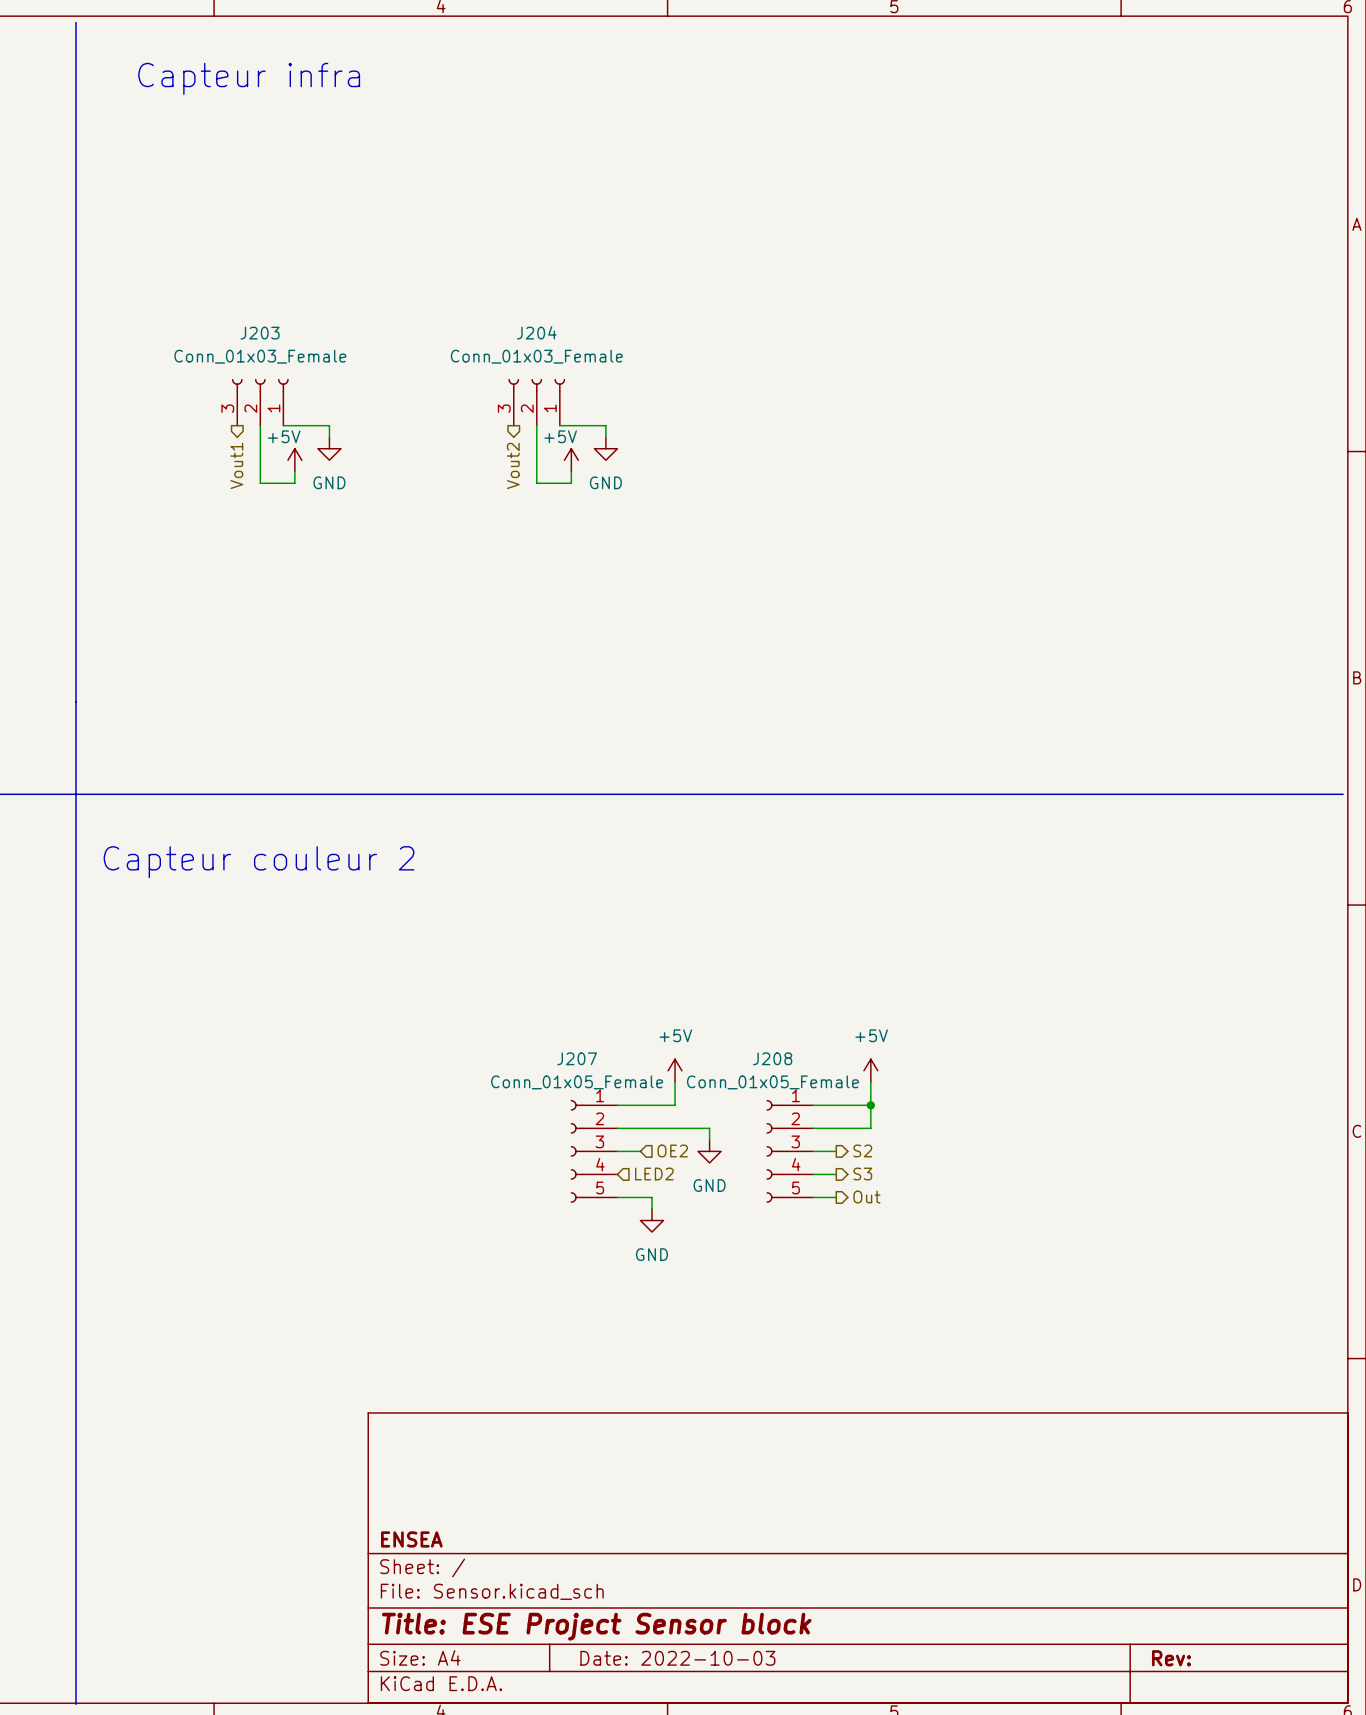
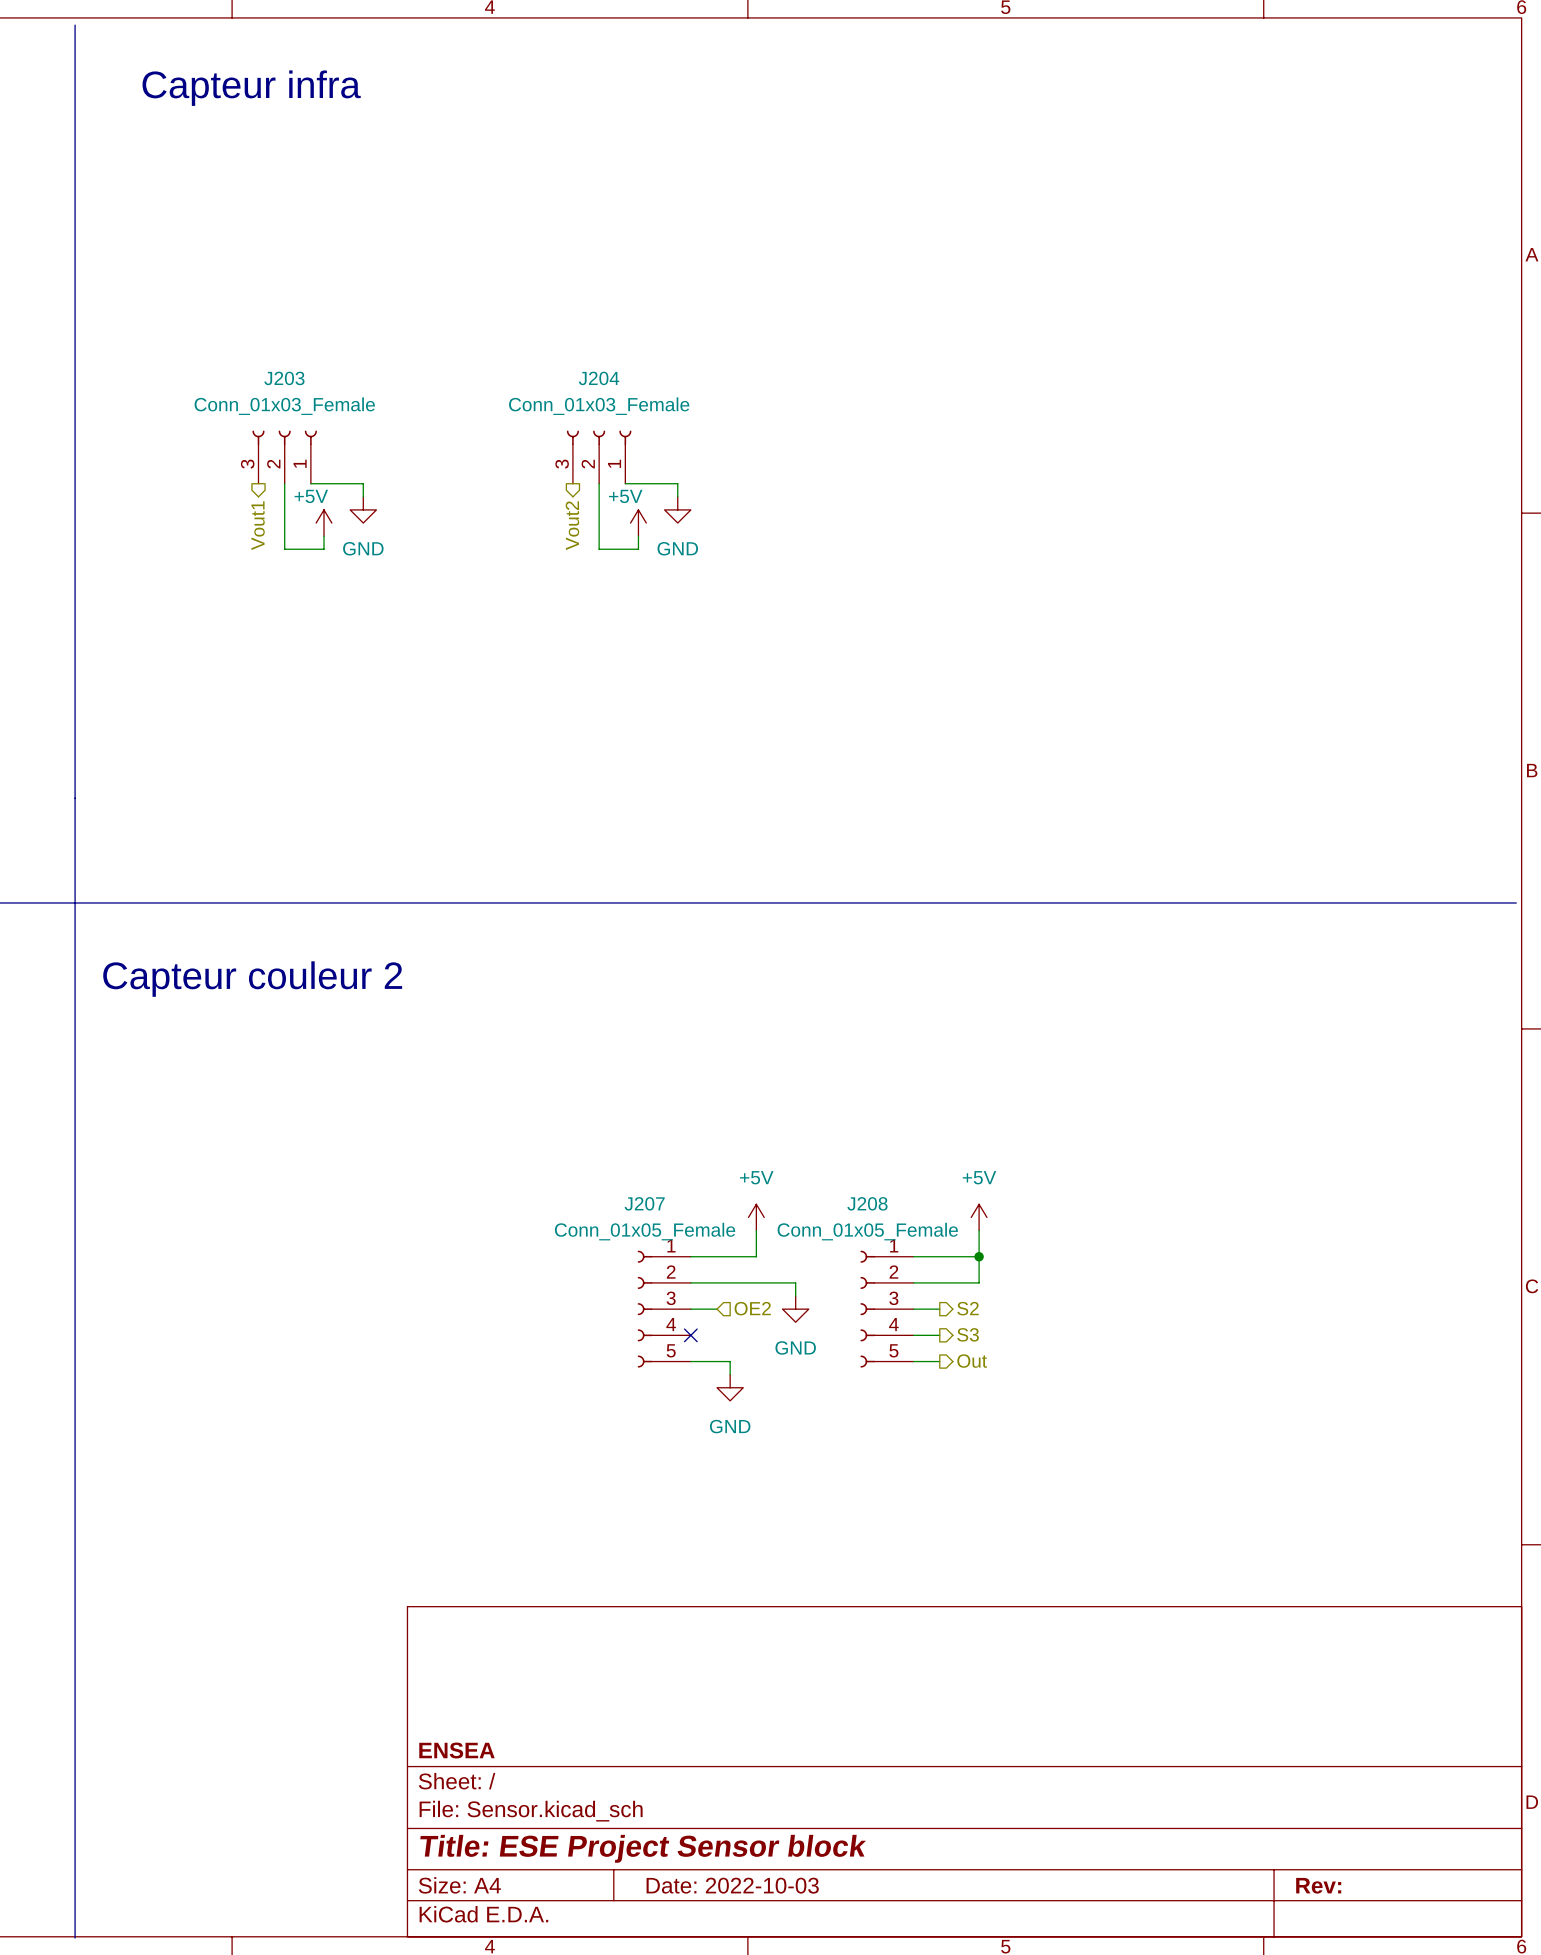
no-connect mark: none -> (690, 1335)
hierarchical label: LED2 (654, 1174) -> none

